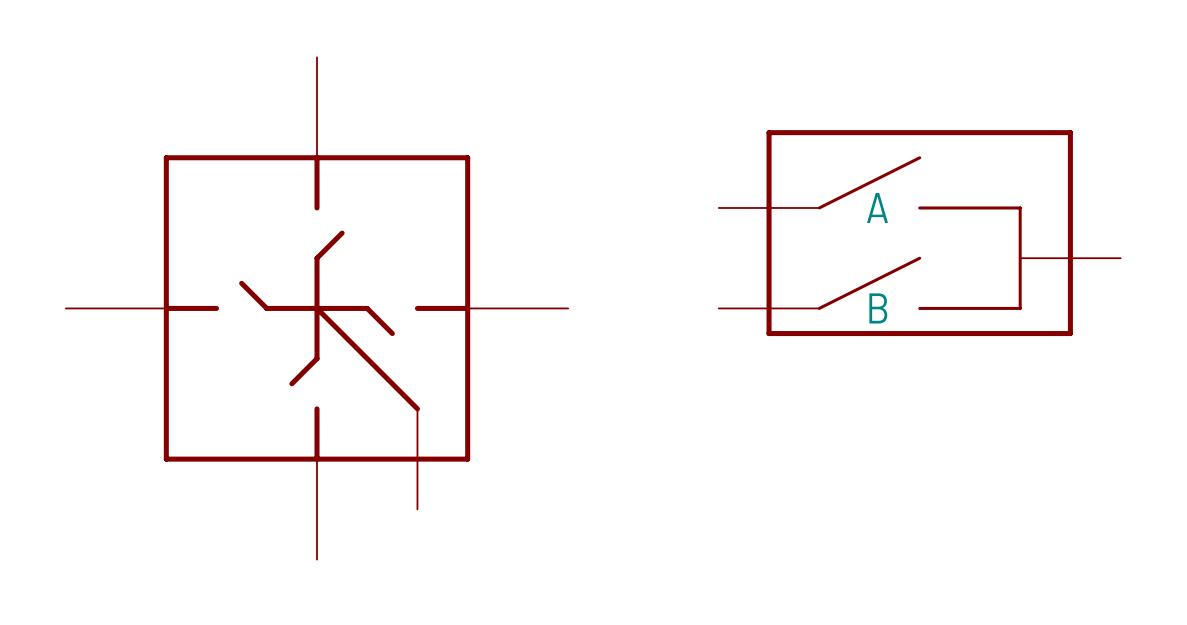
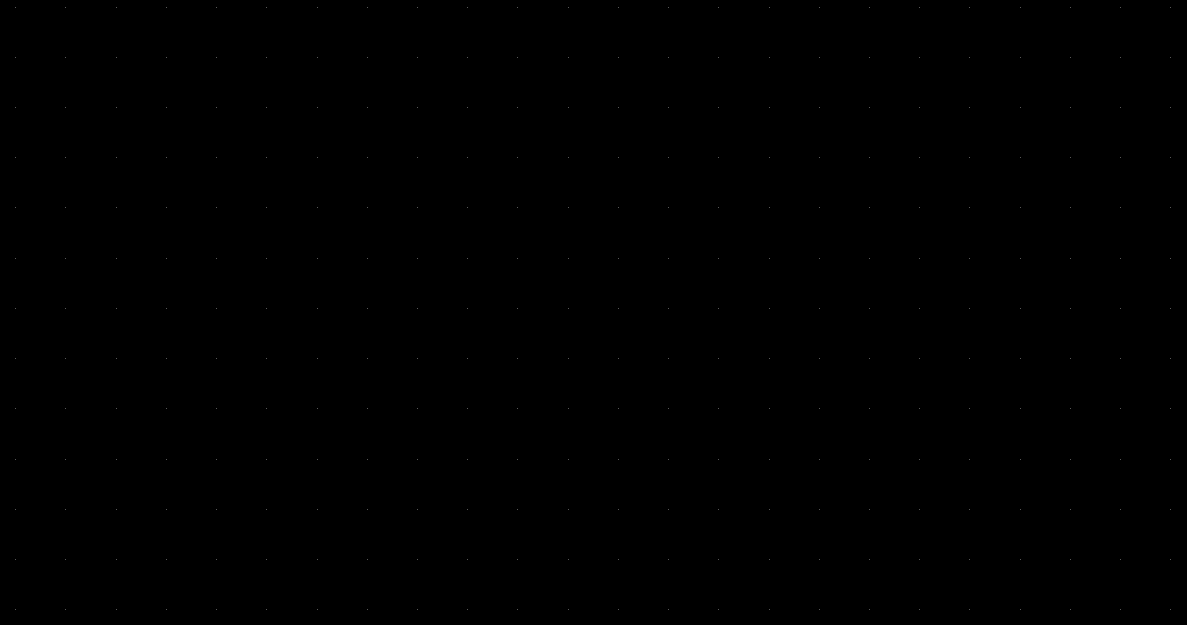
part: (919, 233) -> none
part: (317, 308) -> none

